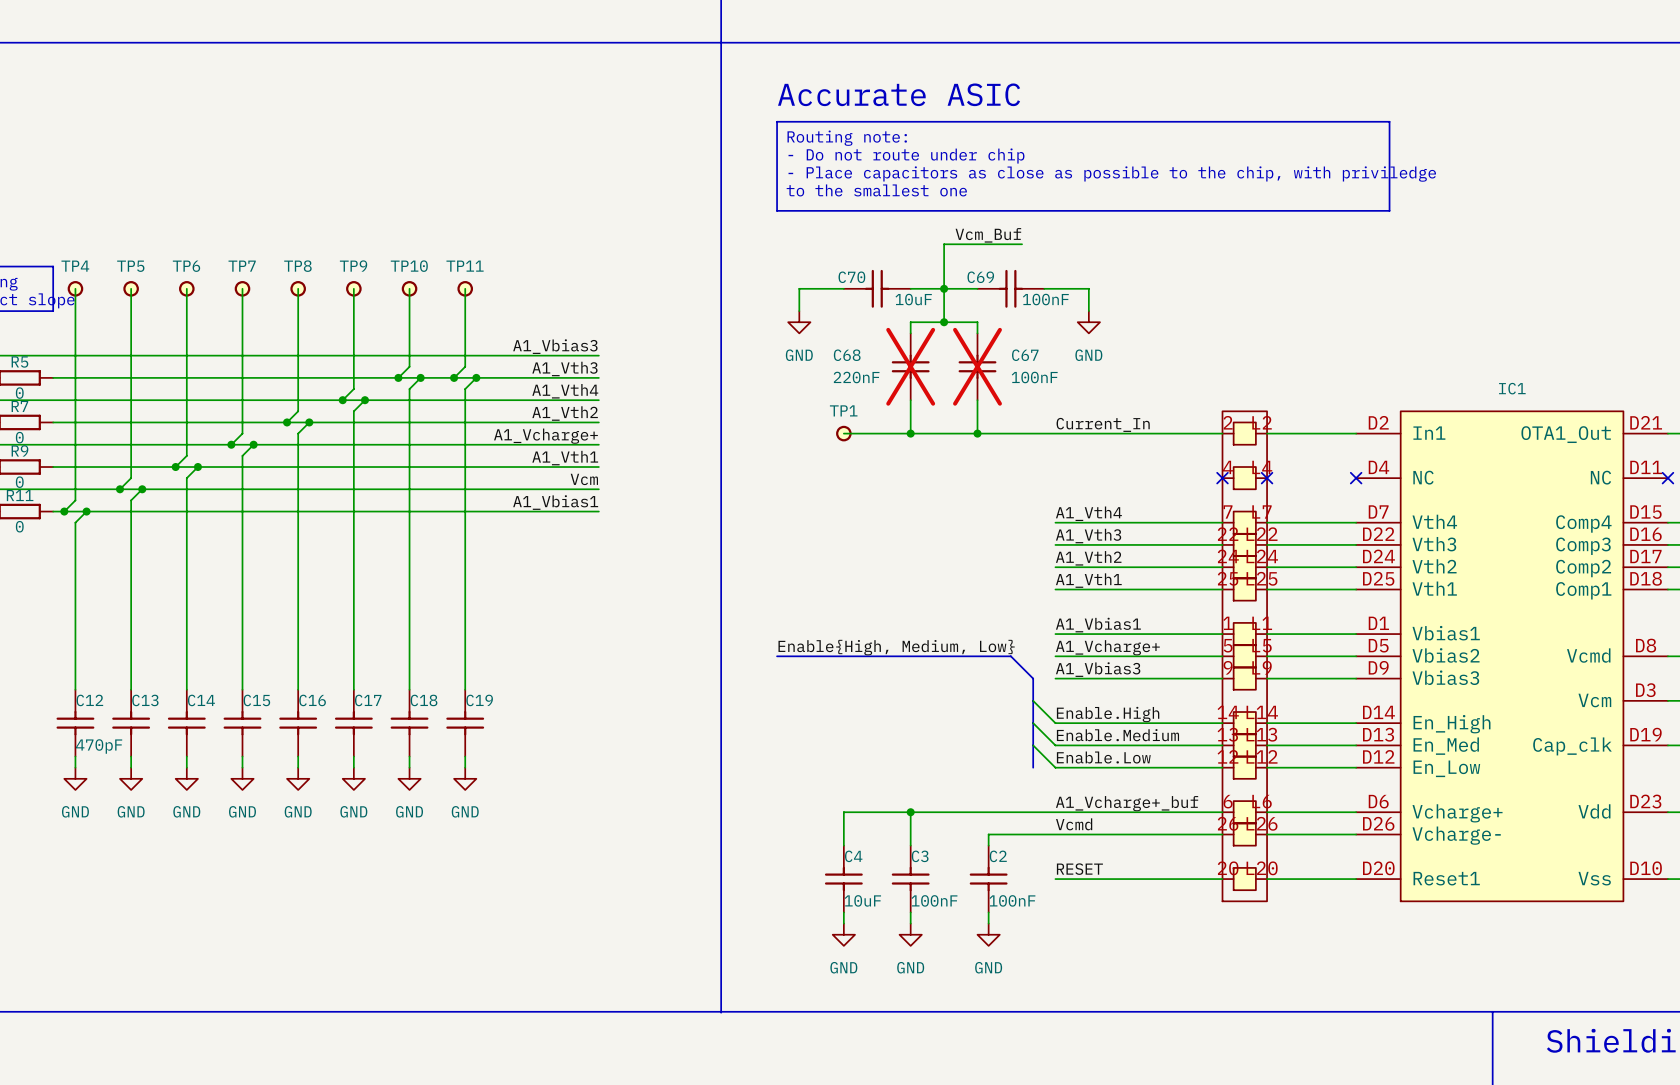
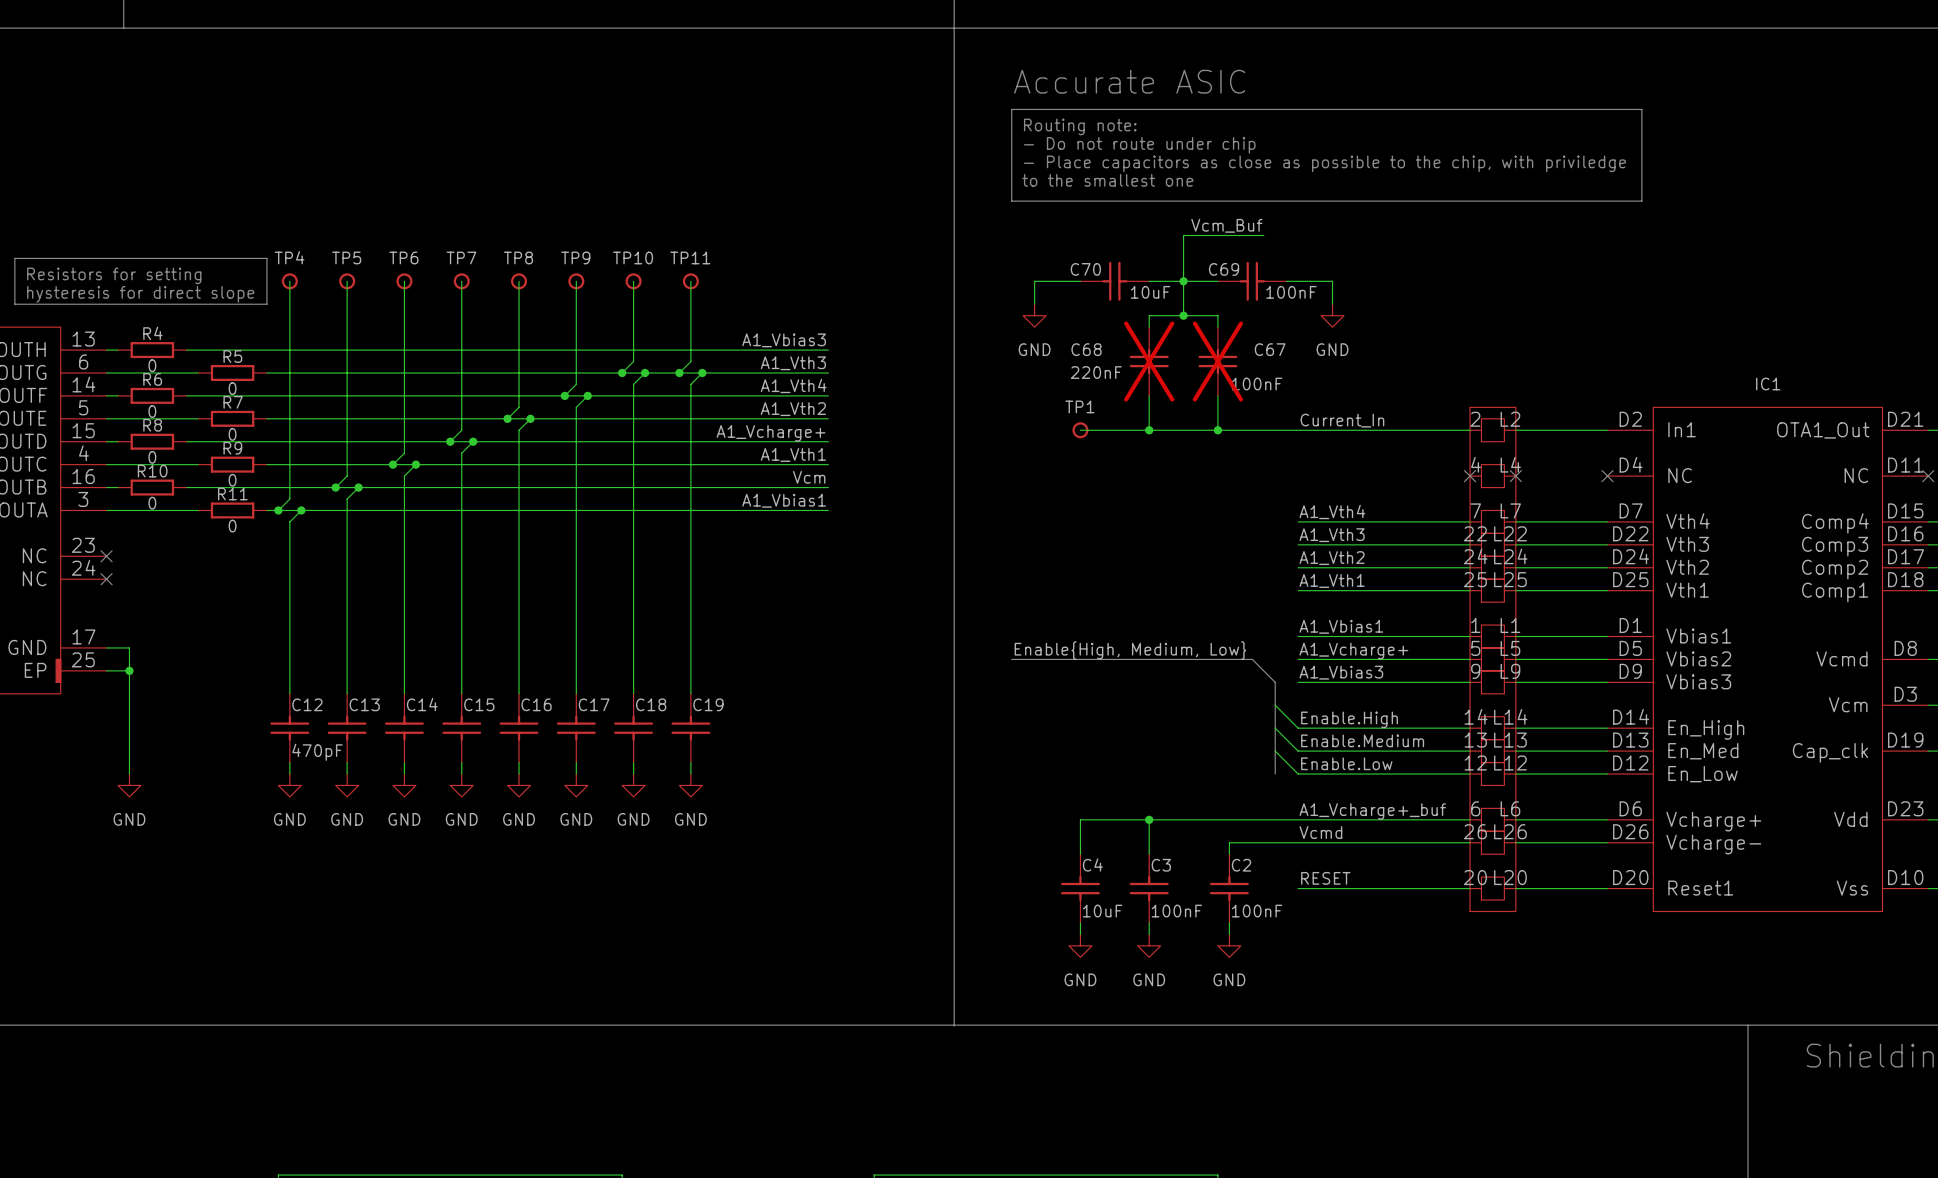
C67 text position: 100nF (1034, 377) -> 100nF (1257, 384)

